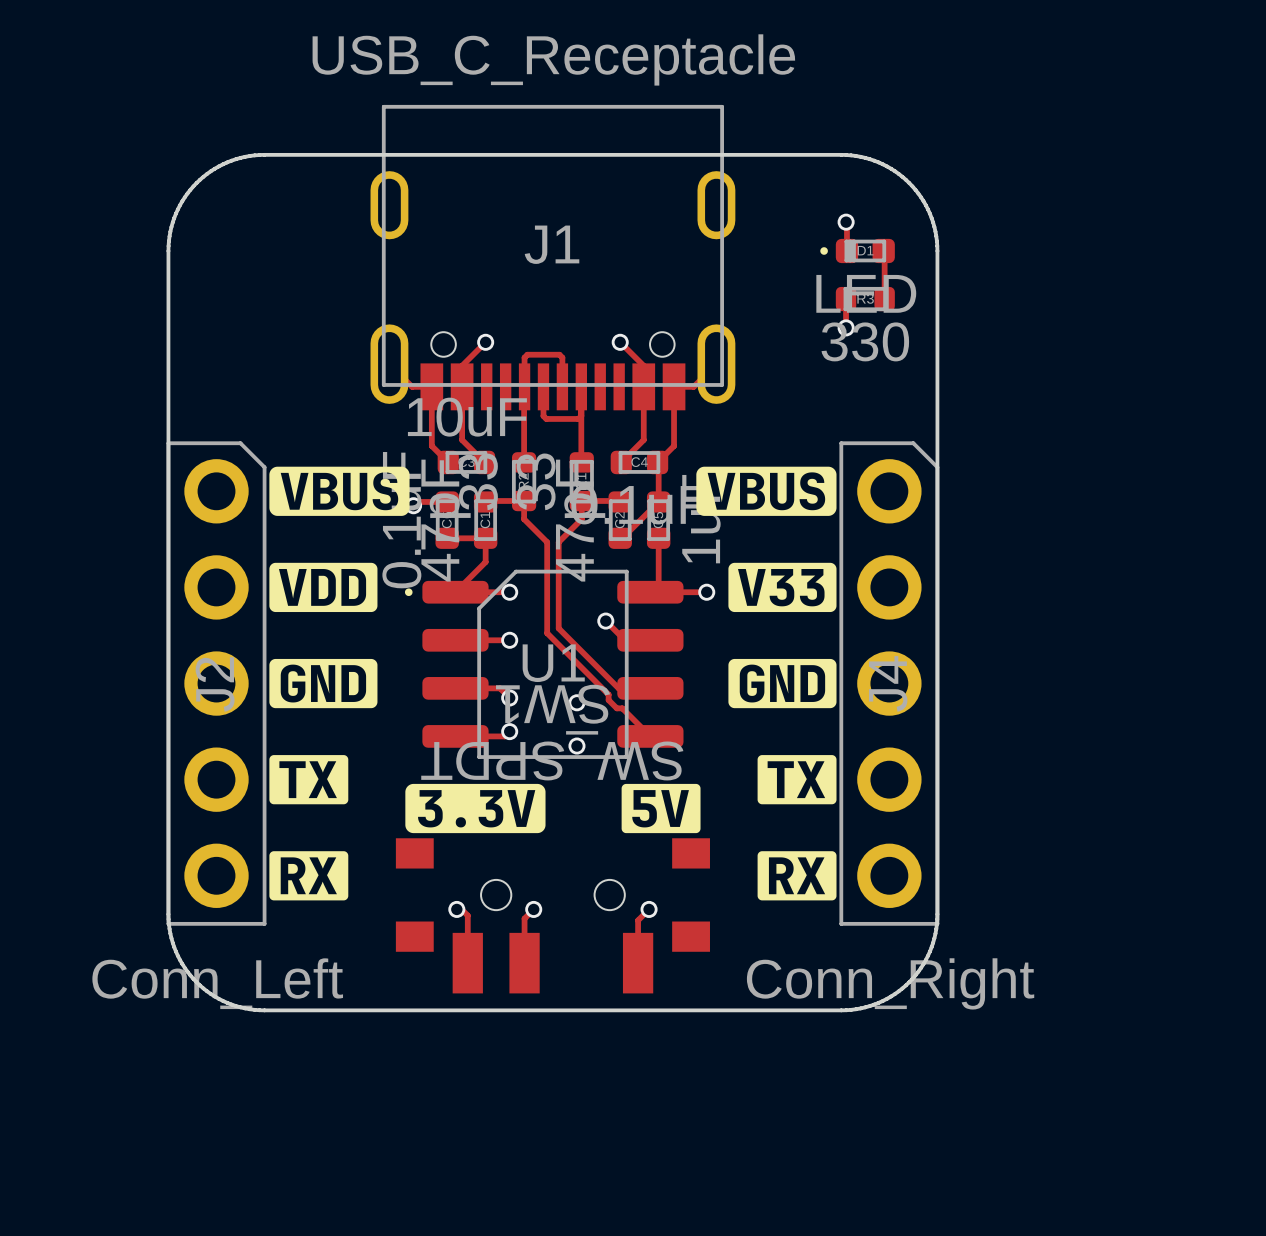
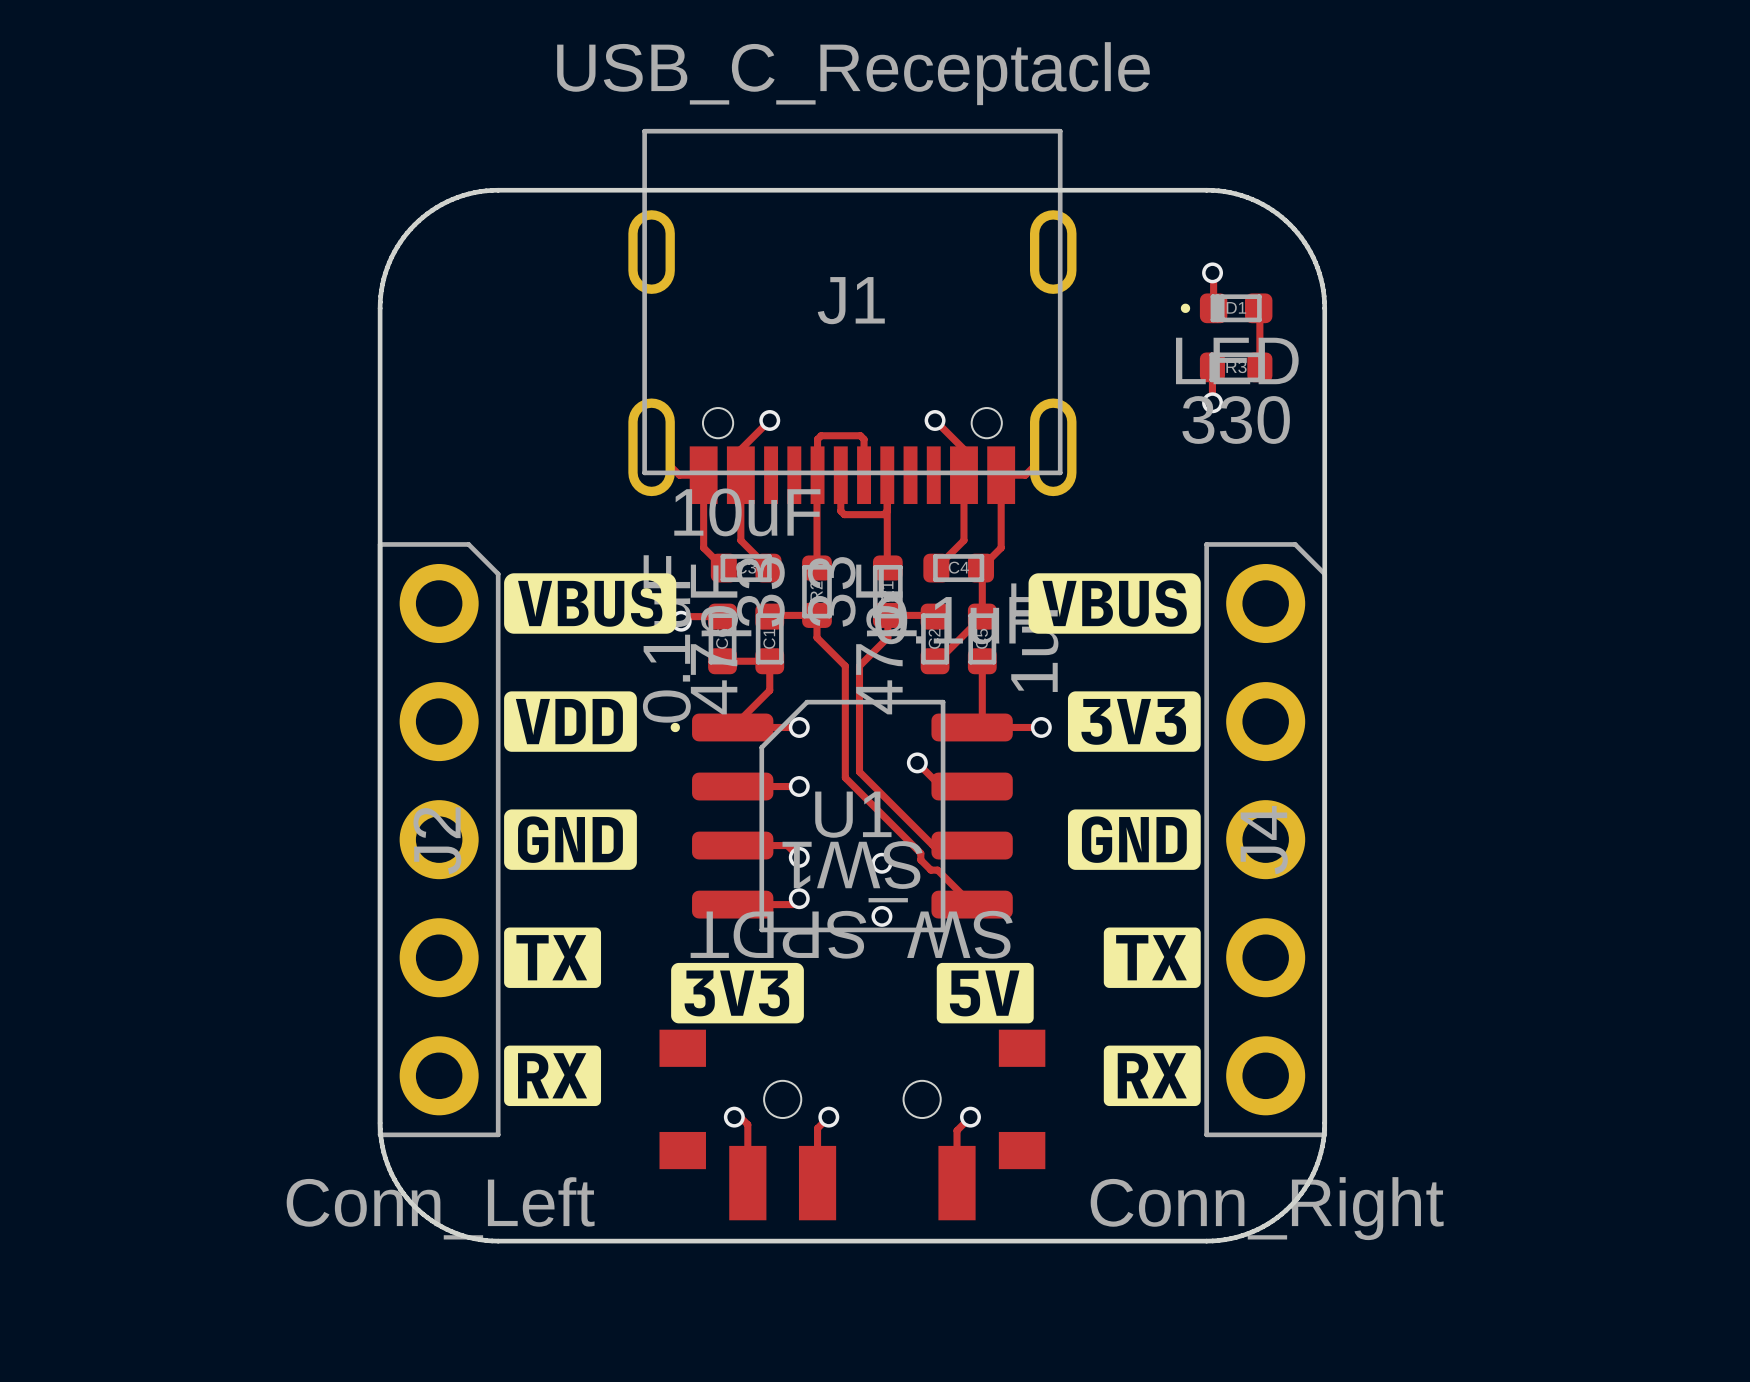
drawing shape: [728, 562, 837, 613] -> [1067, 691, 1201, 752]
drawing shape: [405, 783, 546, 834] -> [671, 962, 804, 1024]

